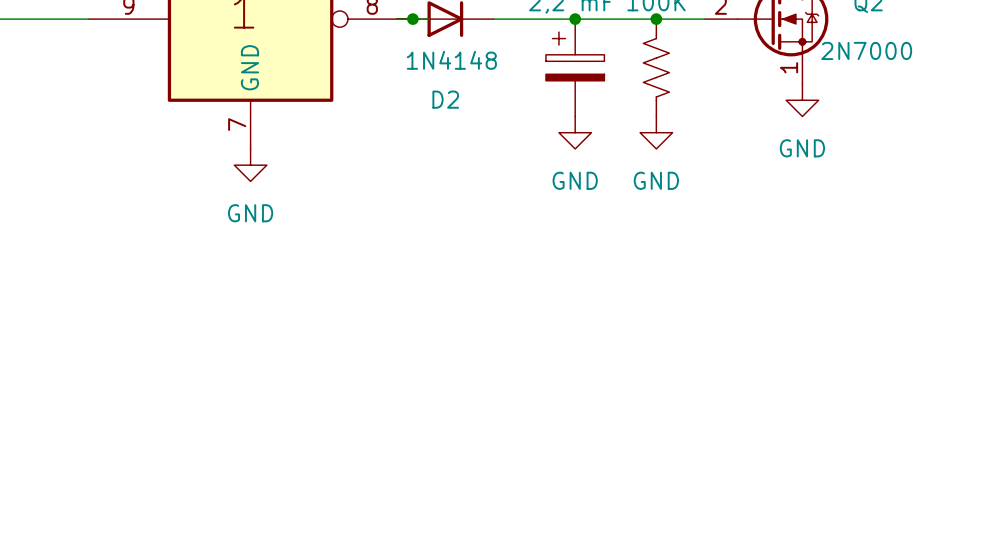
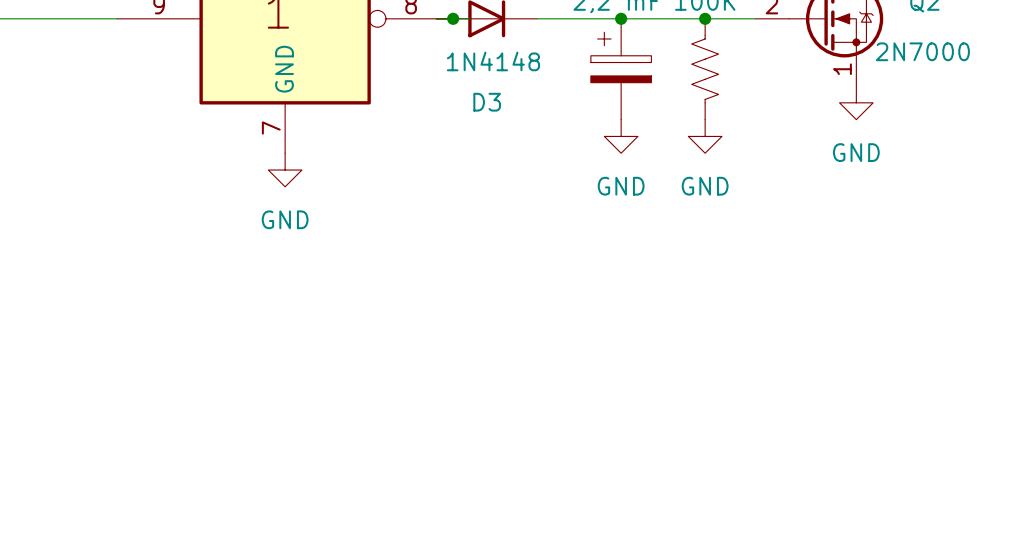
D2 name: D2 (445, 99) -> D3 (487, 102)

